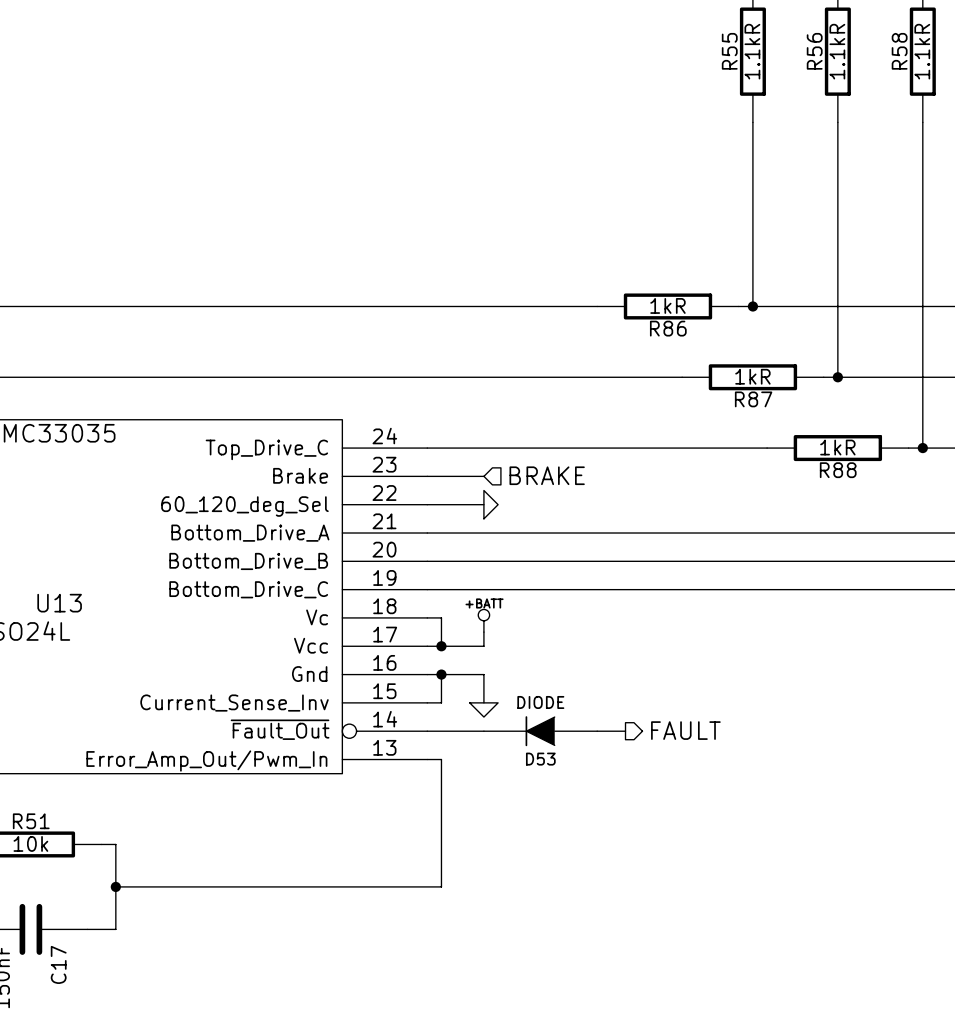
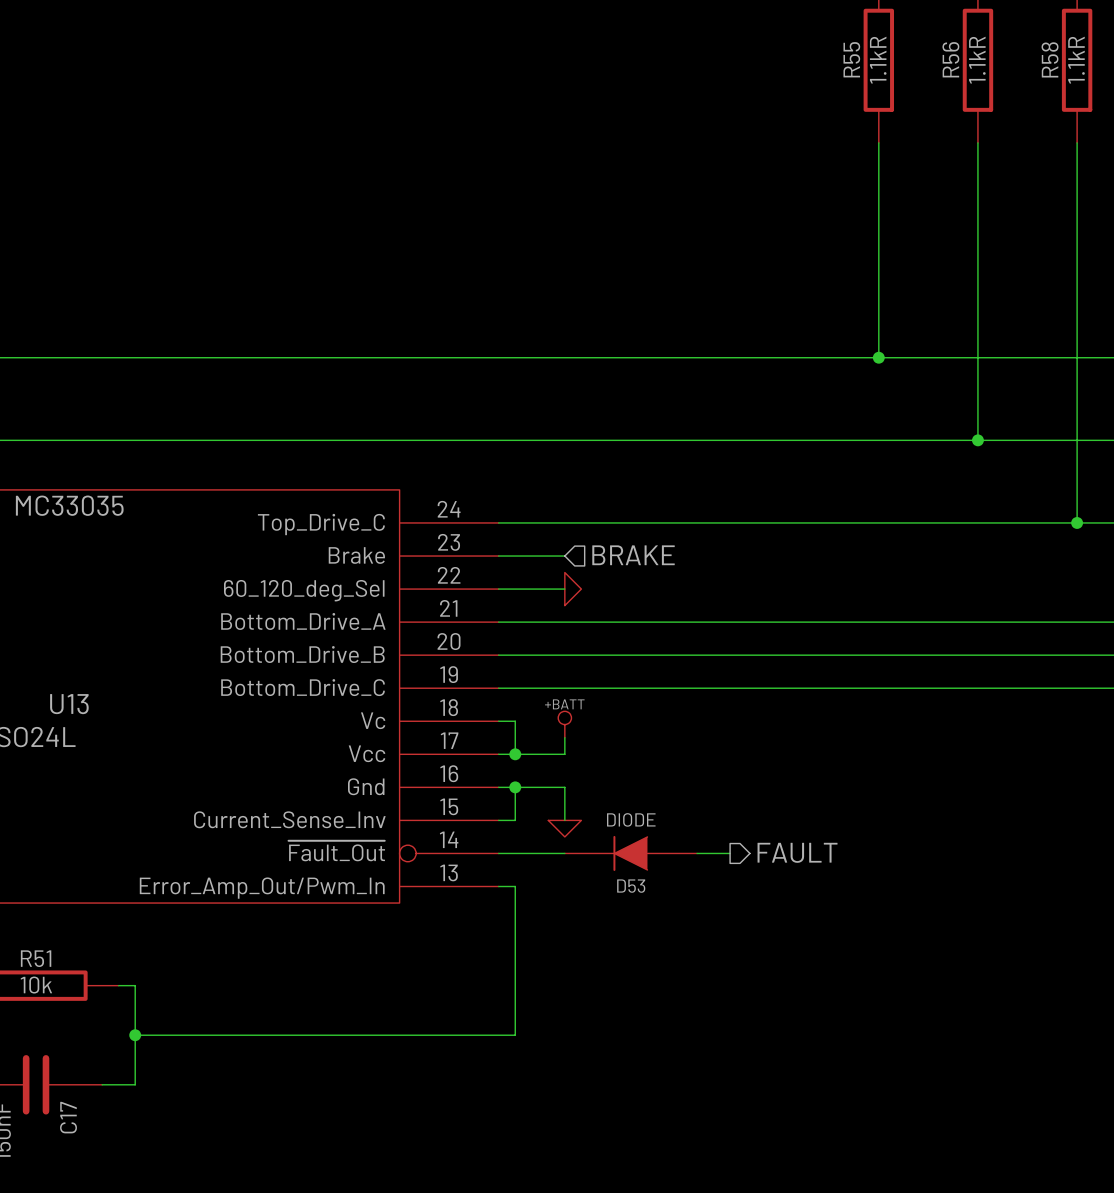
wire: none -> (697, 357) (862, 357)
R86: 1kR (667, 306) -> none
wire: none -> (796, 440) (961, 440)
R87: 1kR (752, 377) -> none
wire: none -> (895, 522) (1060, 522)
R88: 1kR (837, 448) -> none

